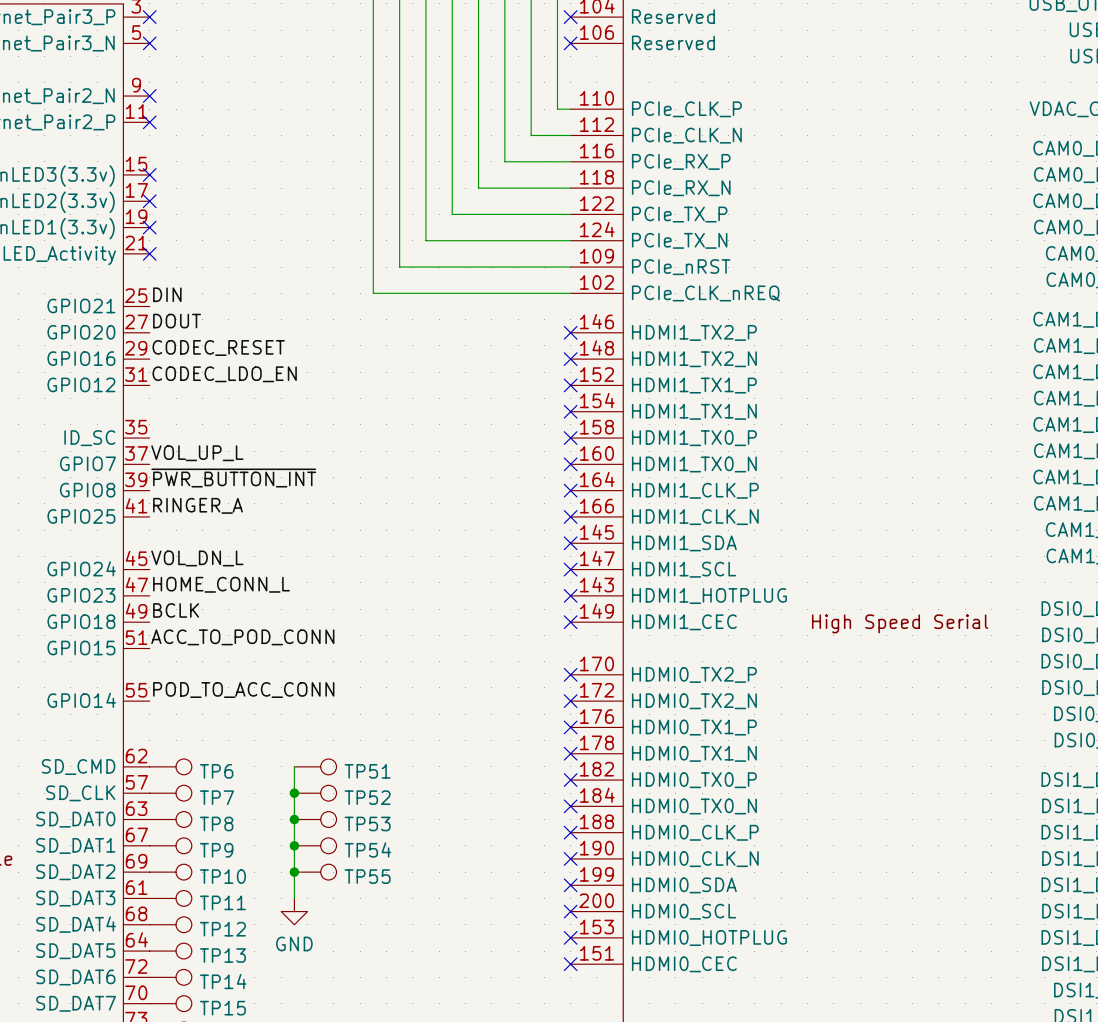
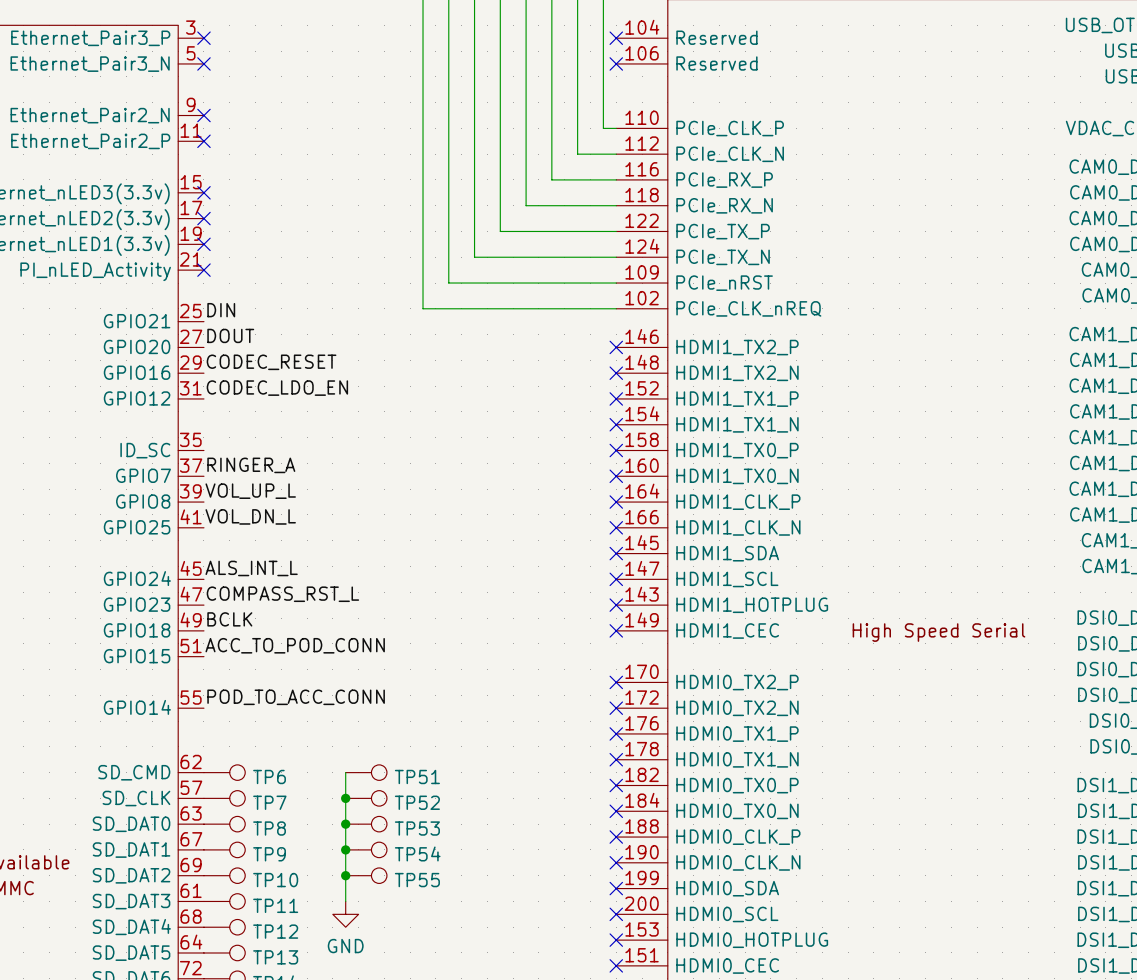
label: VOL_UP_L (197, 453) -> RINGER_A (251, 465)
label: ~{PWR_BUTTON_INT} (233, 478) -> VOL_UP_L (250, 491)
label: RINGER_A (198, 505) -> VOL_DN_L (250, 516)
label: VOL_DN_L (197, 558) -> ALS_INT_L (251, 568)
label: HOME_CONN_L (221, 584) -> COMPASS_RST_L (282, 594)

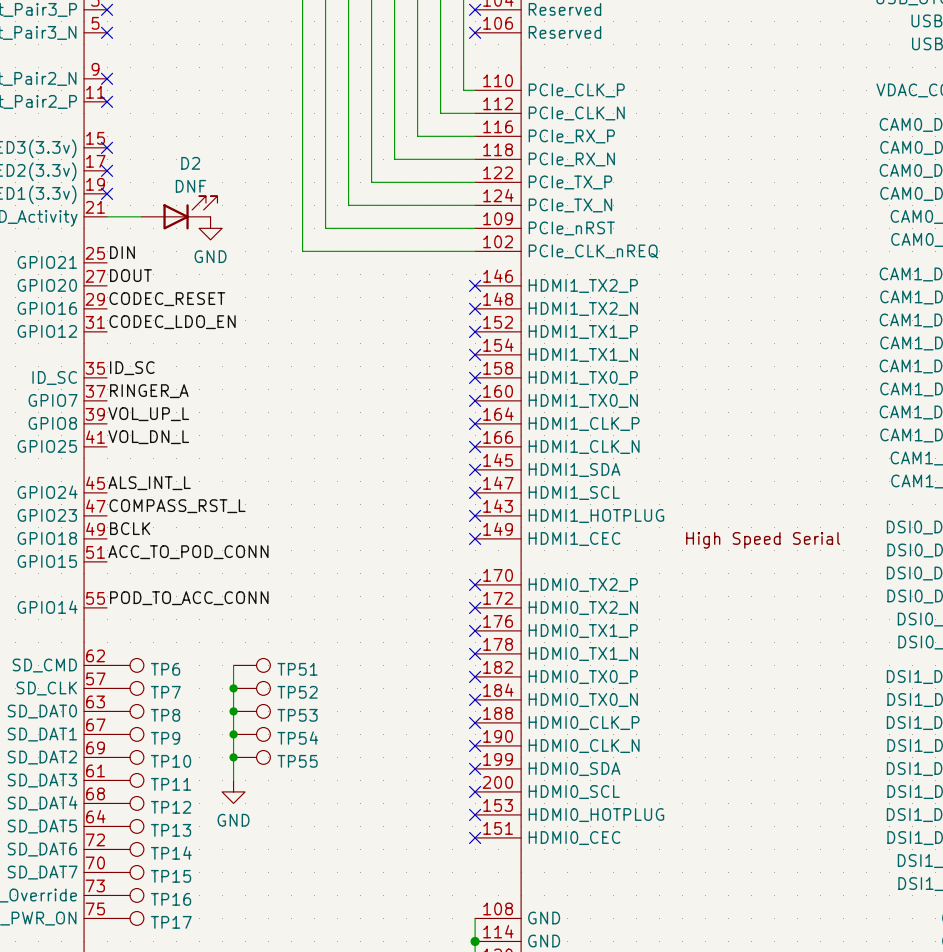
D2: none -> DNF (179, 212)
wire: none -> (107, 216) (141, 216)
no-connect mark: (203, 270) -> none
power symbol: none -> GND (210, 228)
label: none -> ID_SC (132, 368)

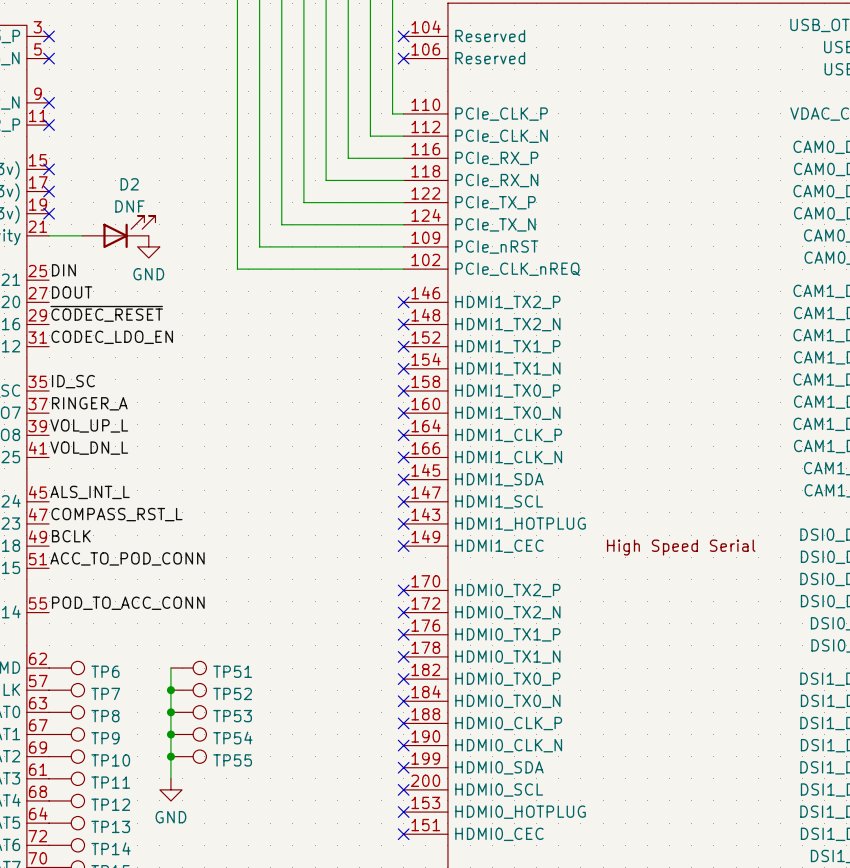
label: CODEC_RESET (167, 299) -> ~{CODEC_RESET} (106, 313)

